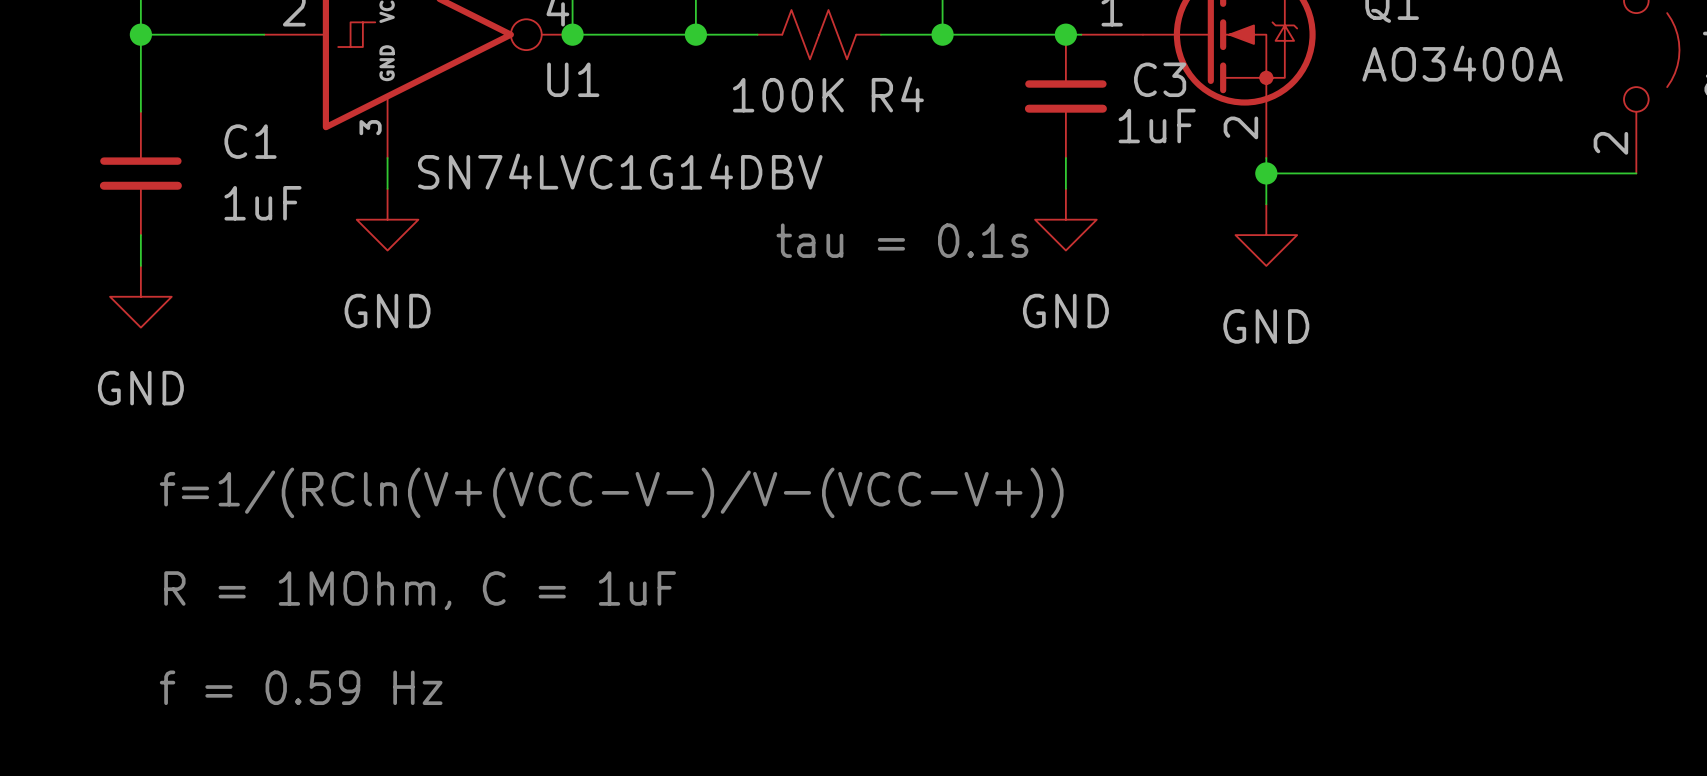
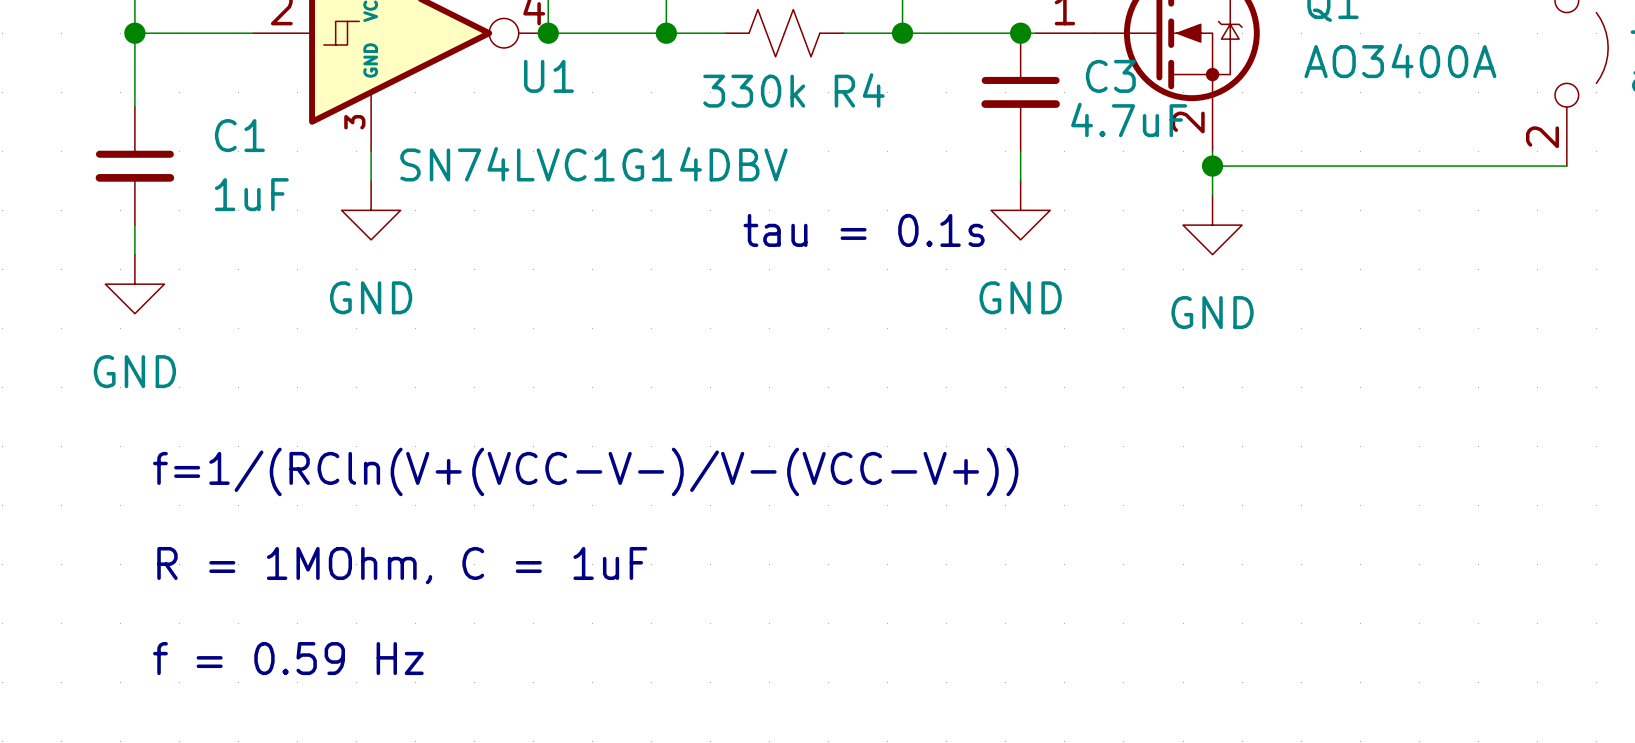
R4 value: 100K (788, 95) -> 330k (754, 91)
C3 value: 1uF (1157, 126) -> 4.7uF (1129, 119)

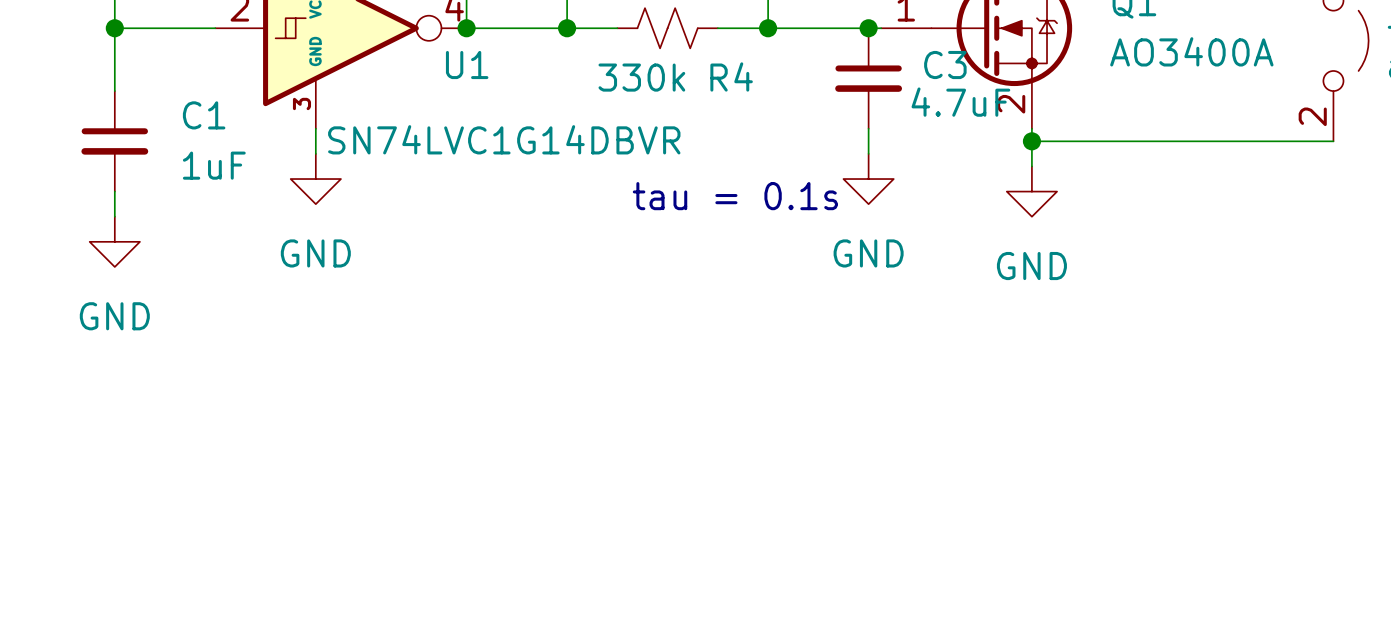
U1 value: SN74LVC1G14DBV (593, 164) -> SN74LVC1G14DBVR (504, 139)
text: f=1/(RCln(V+(VCC-V-)/V-(VCC-V+)) (585, 471) -> none
text: R = 1MOhm, C = 1uF (402, 565) -> none
text: f = 0.59 Hz (288, 658) -> none

